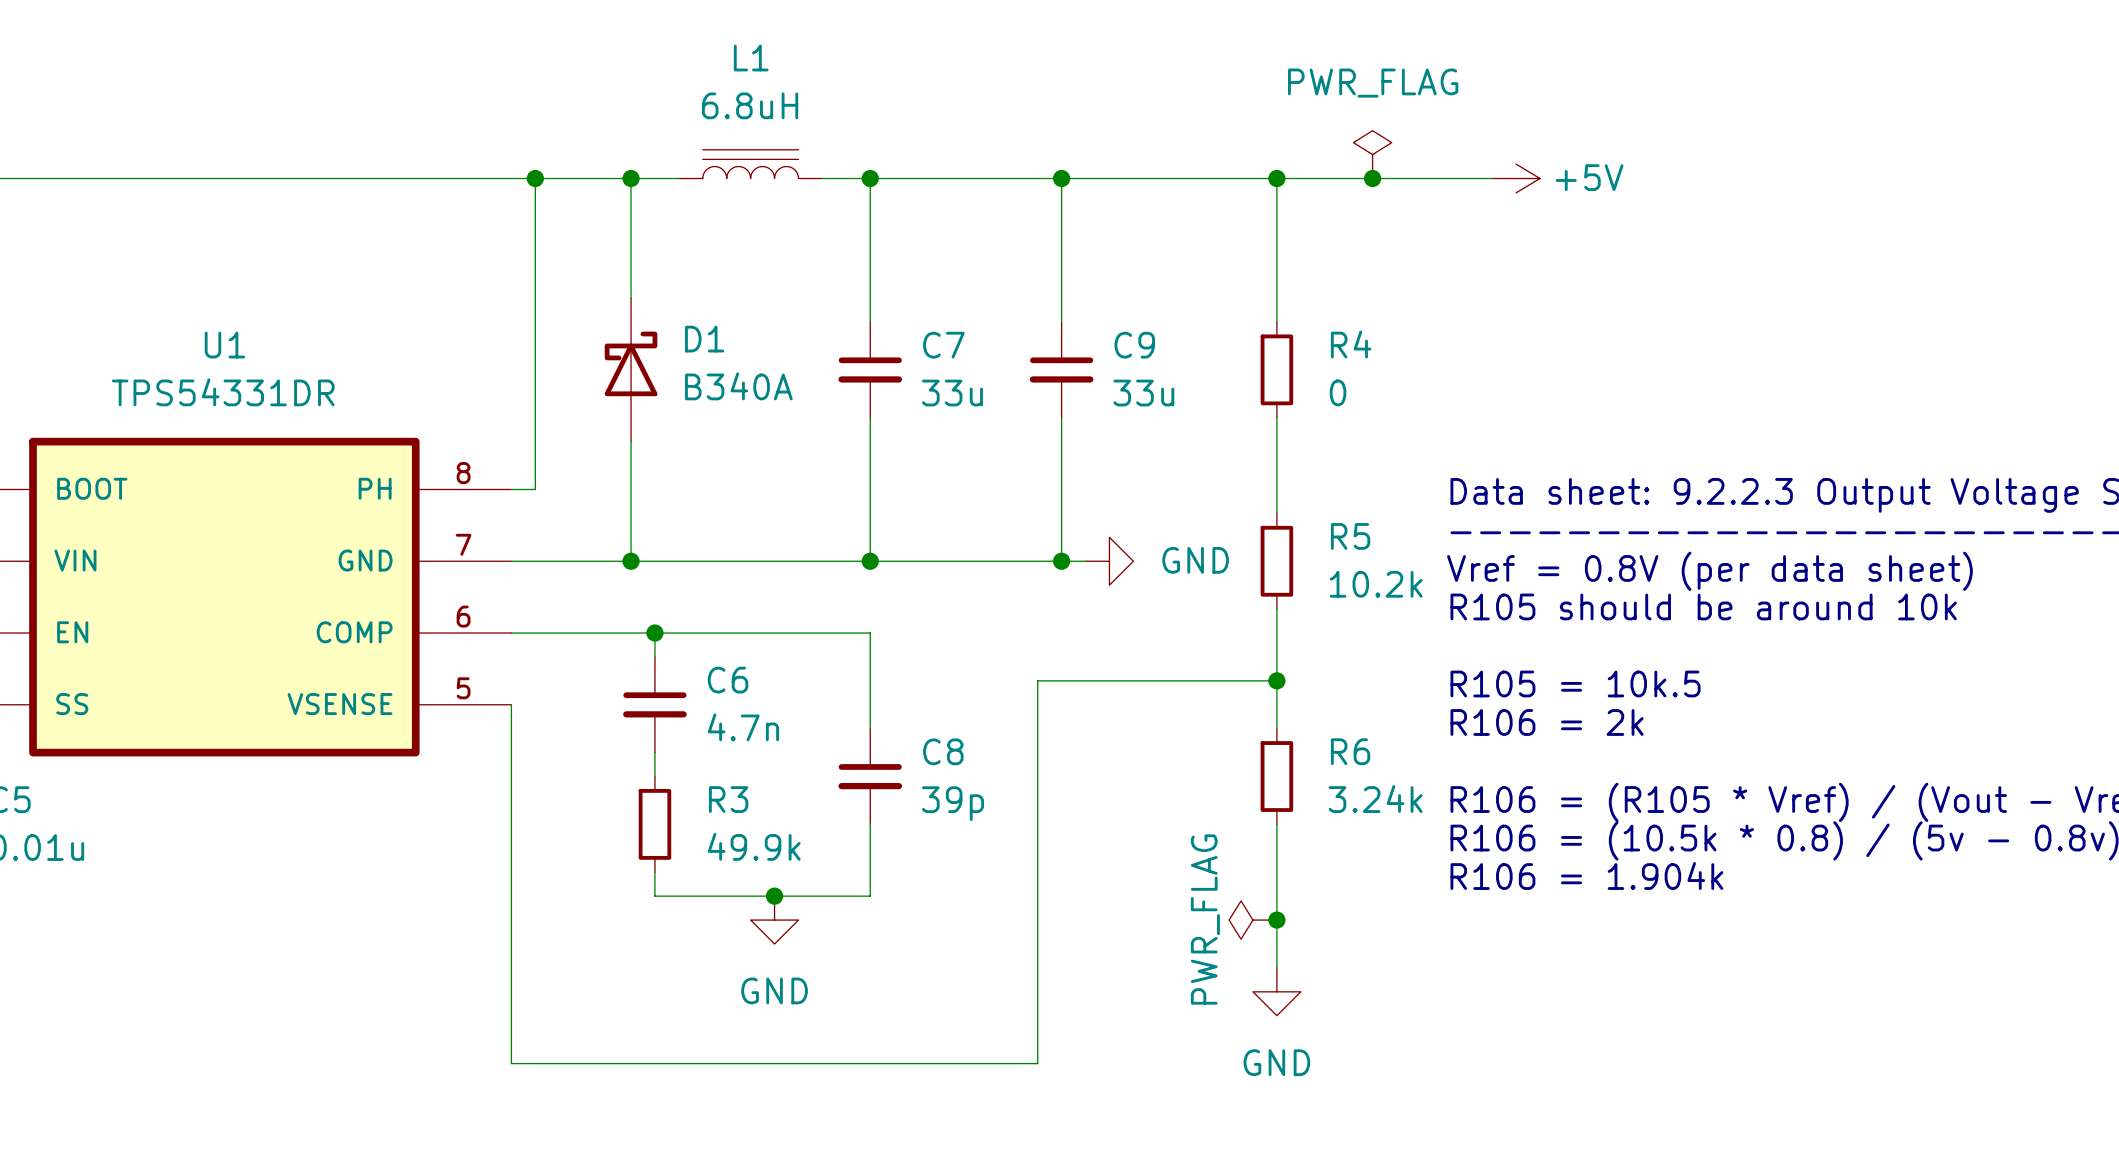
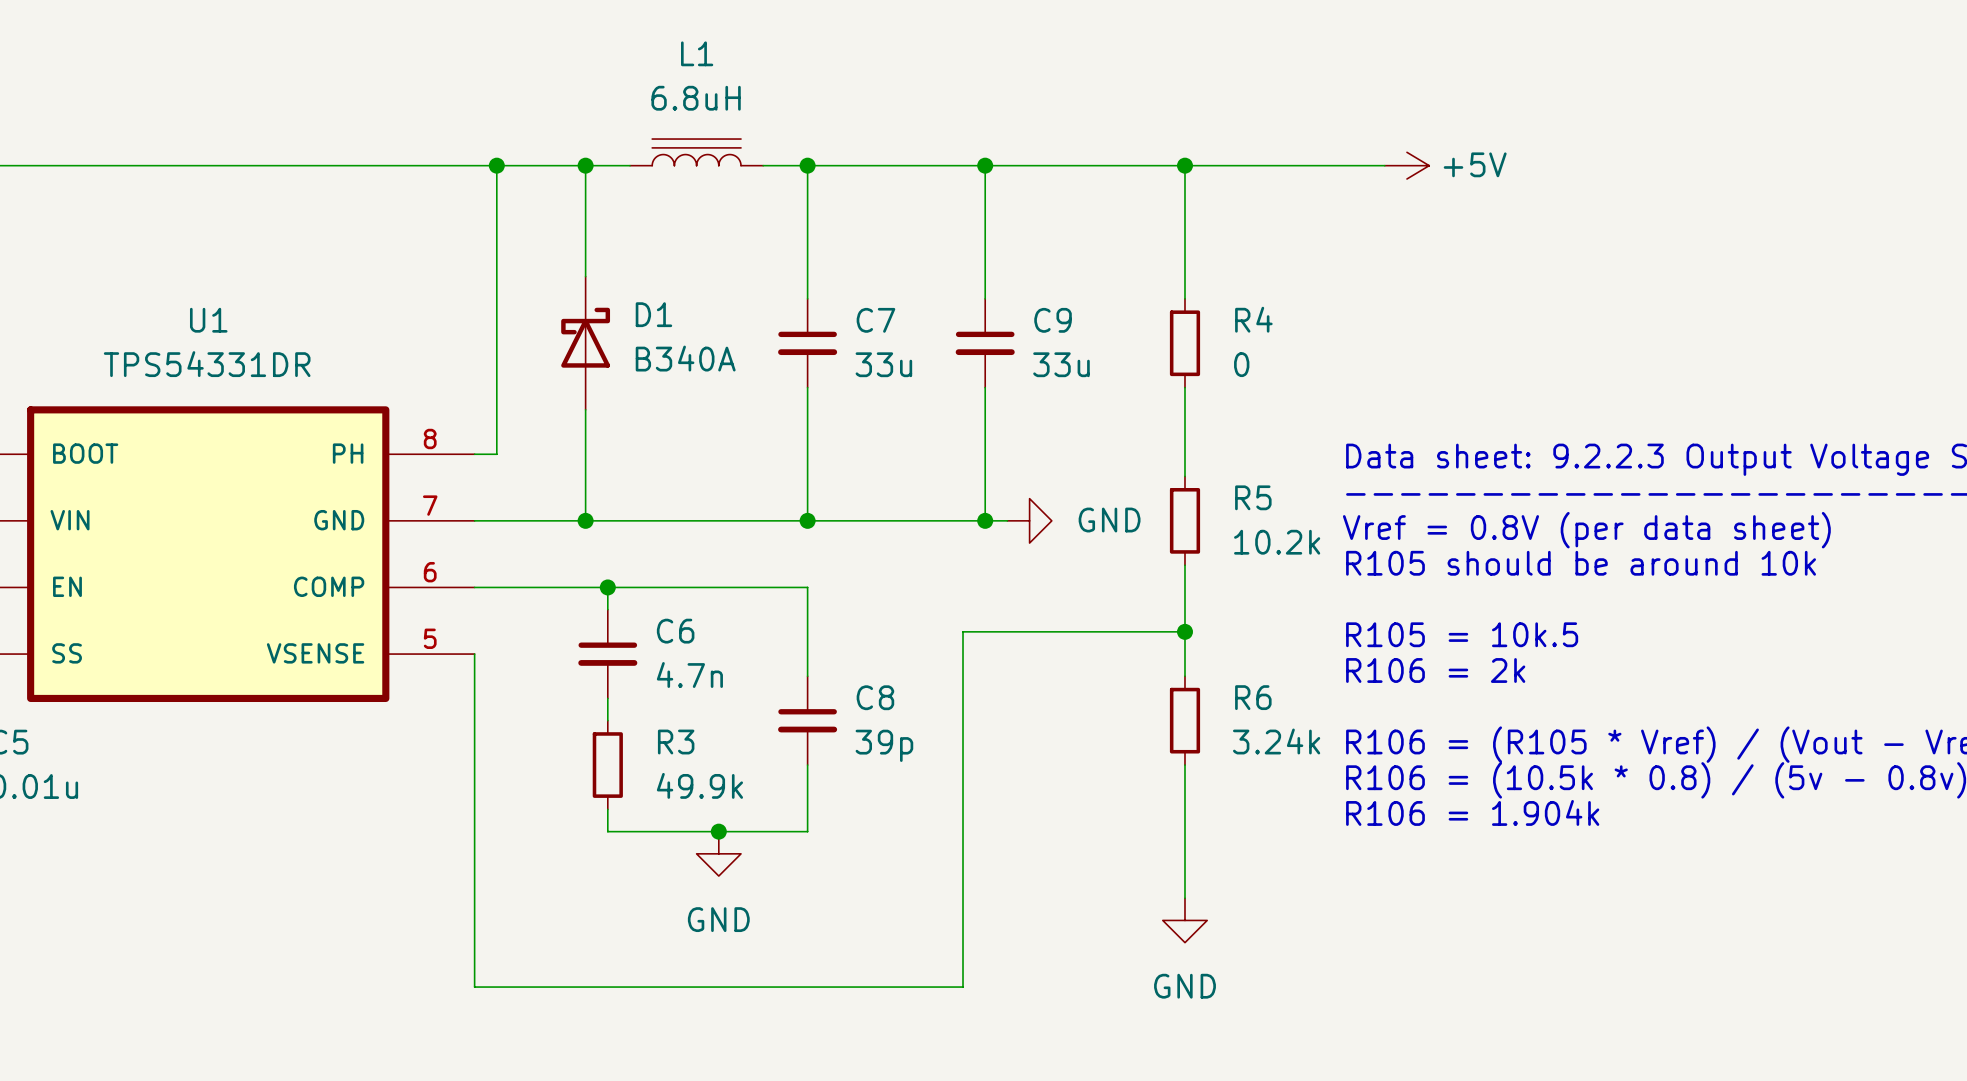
power symbol: PWR_FLAG (1372, 154) -> none
junction: (1372, 178) -> none
power symbol: PWR_FLAG (1252, 920) -> none
junction: (1276, 920) -> none

